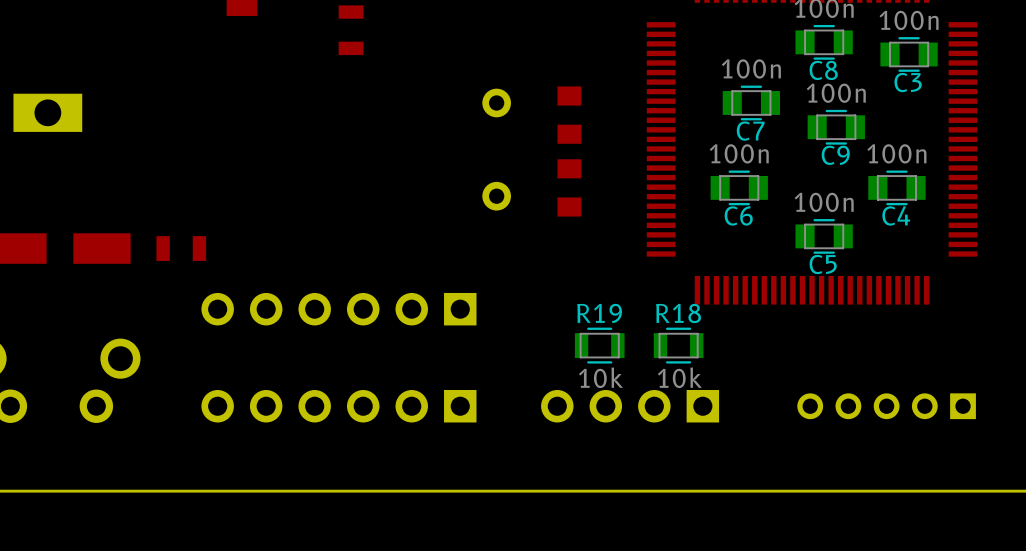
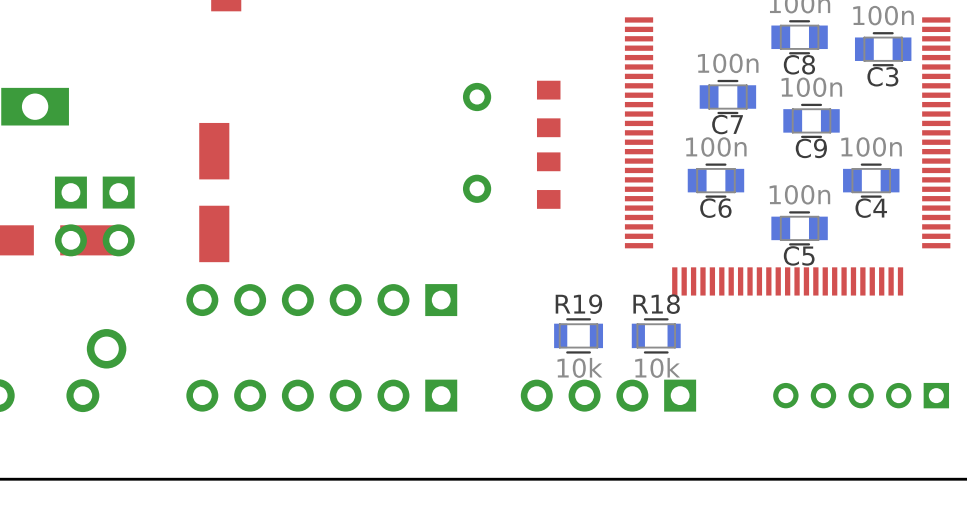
part: (351, 30) -> none
part: none -> (214, 192)
part: none -> (70, 216)
part: none -> (118, 216)
part: (181, 248) -> none

